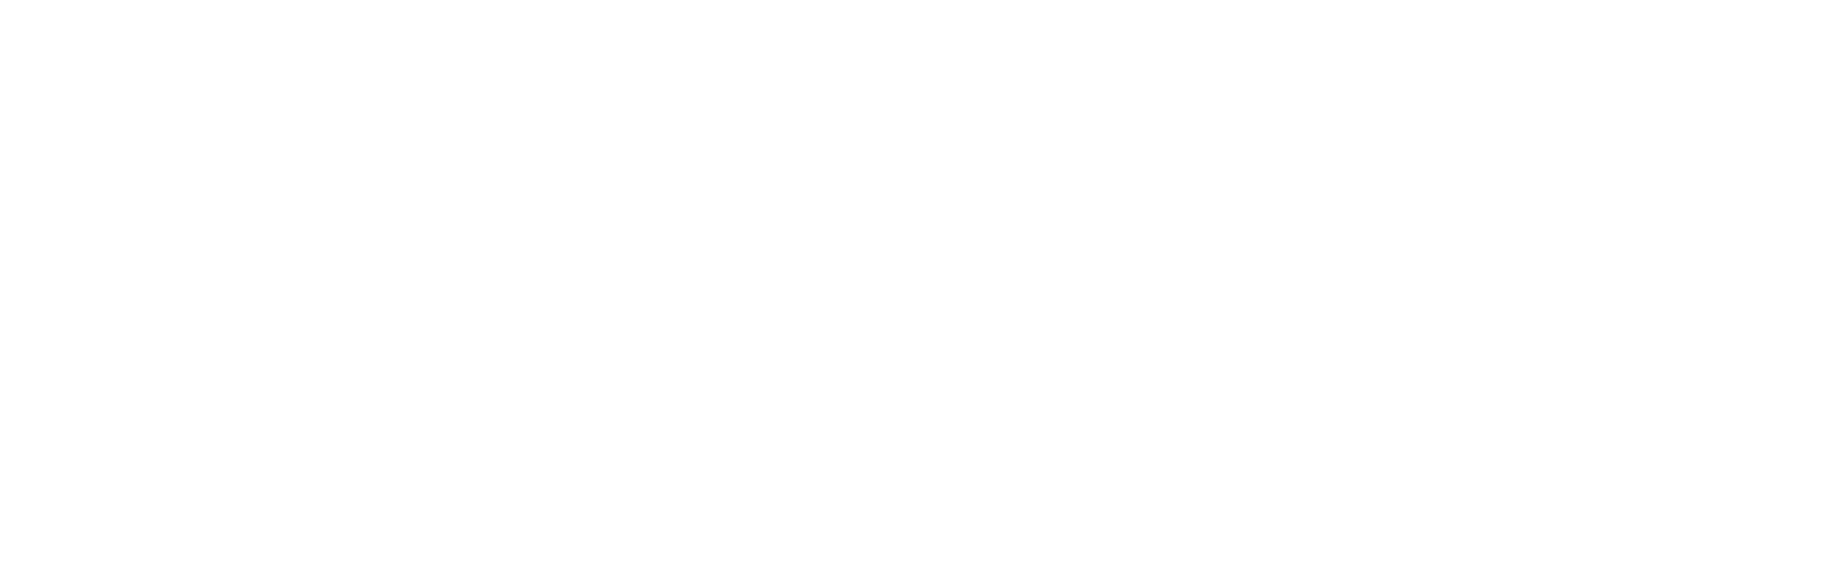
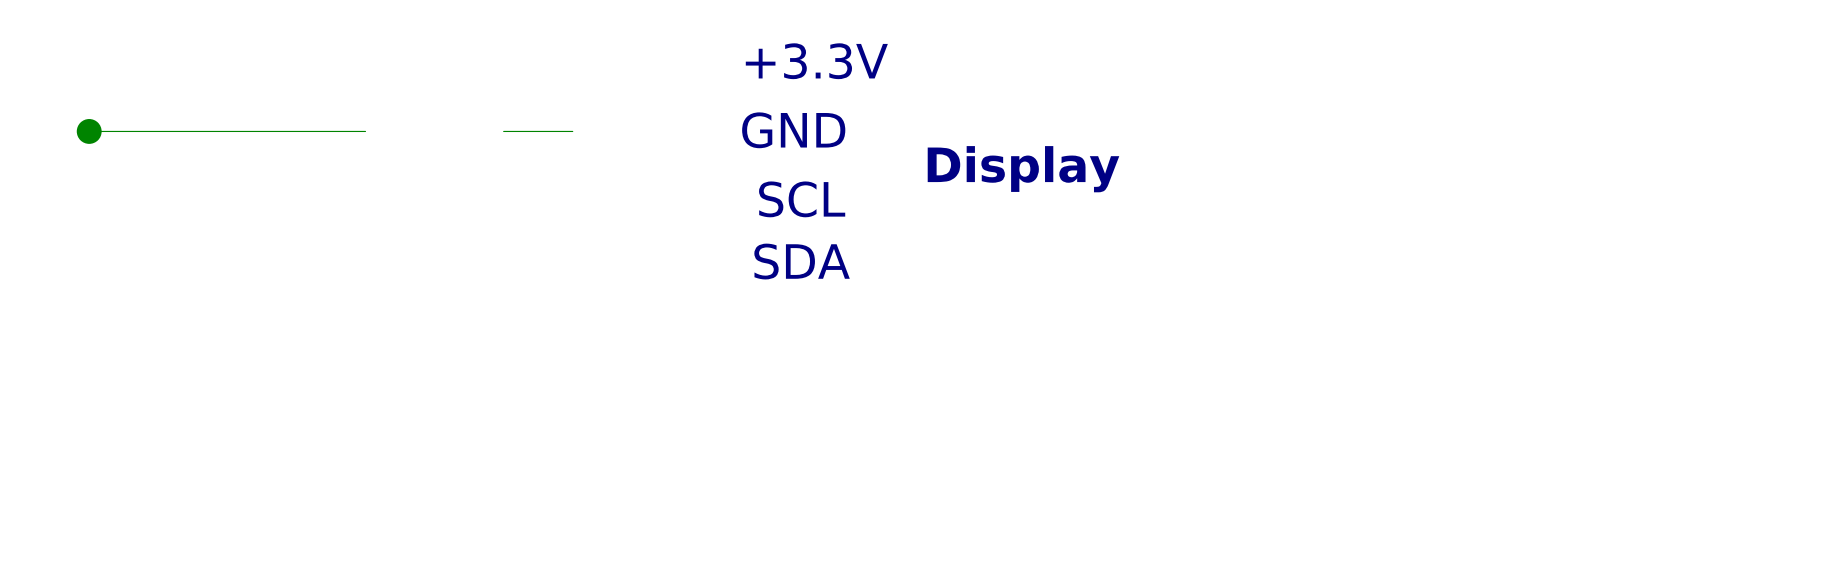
text: none -> +3.3V (816, 61)
text: none -> GND (793, 130)
wire: none -> (89, 131) (365, 131)
junction: none -> (89, 131)
wire: none -> (503, 131) (572, 131)
text: none -> Display (1023, 169)
text: none -> SCL (802, 199)
text: none -> SDA (802, 261)

